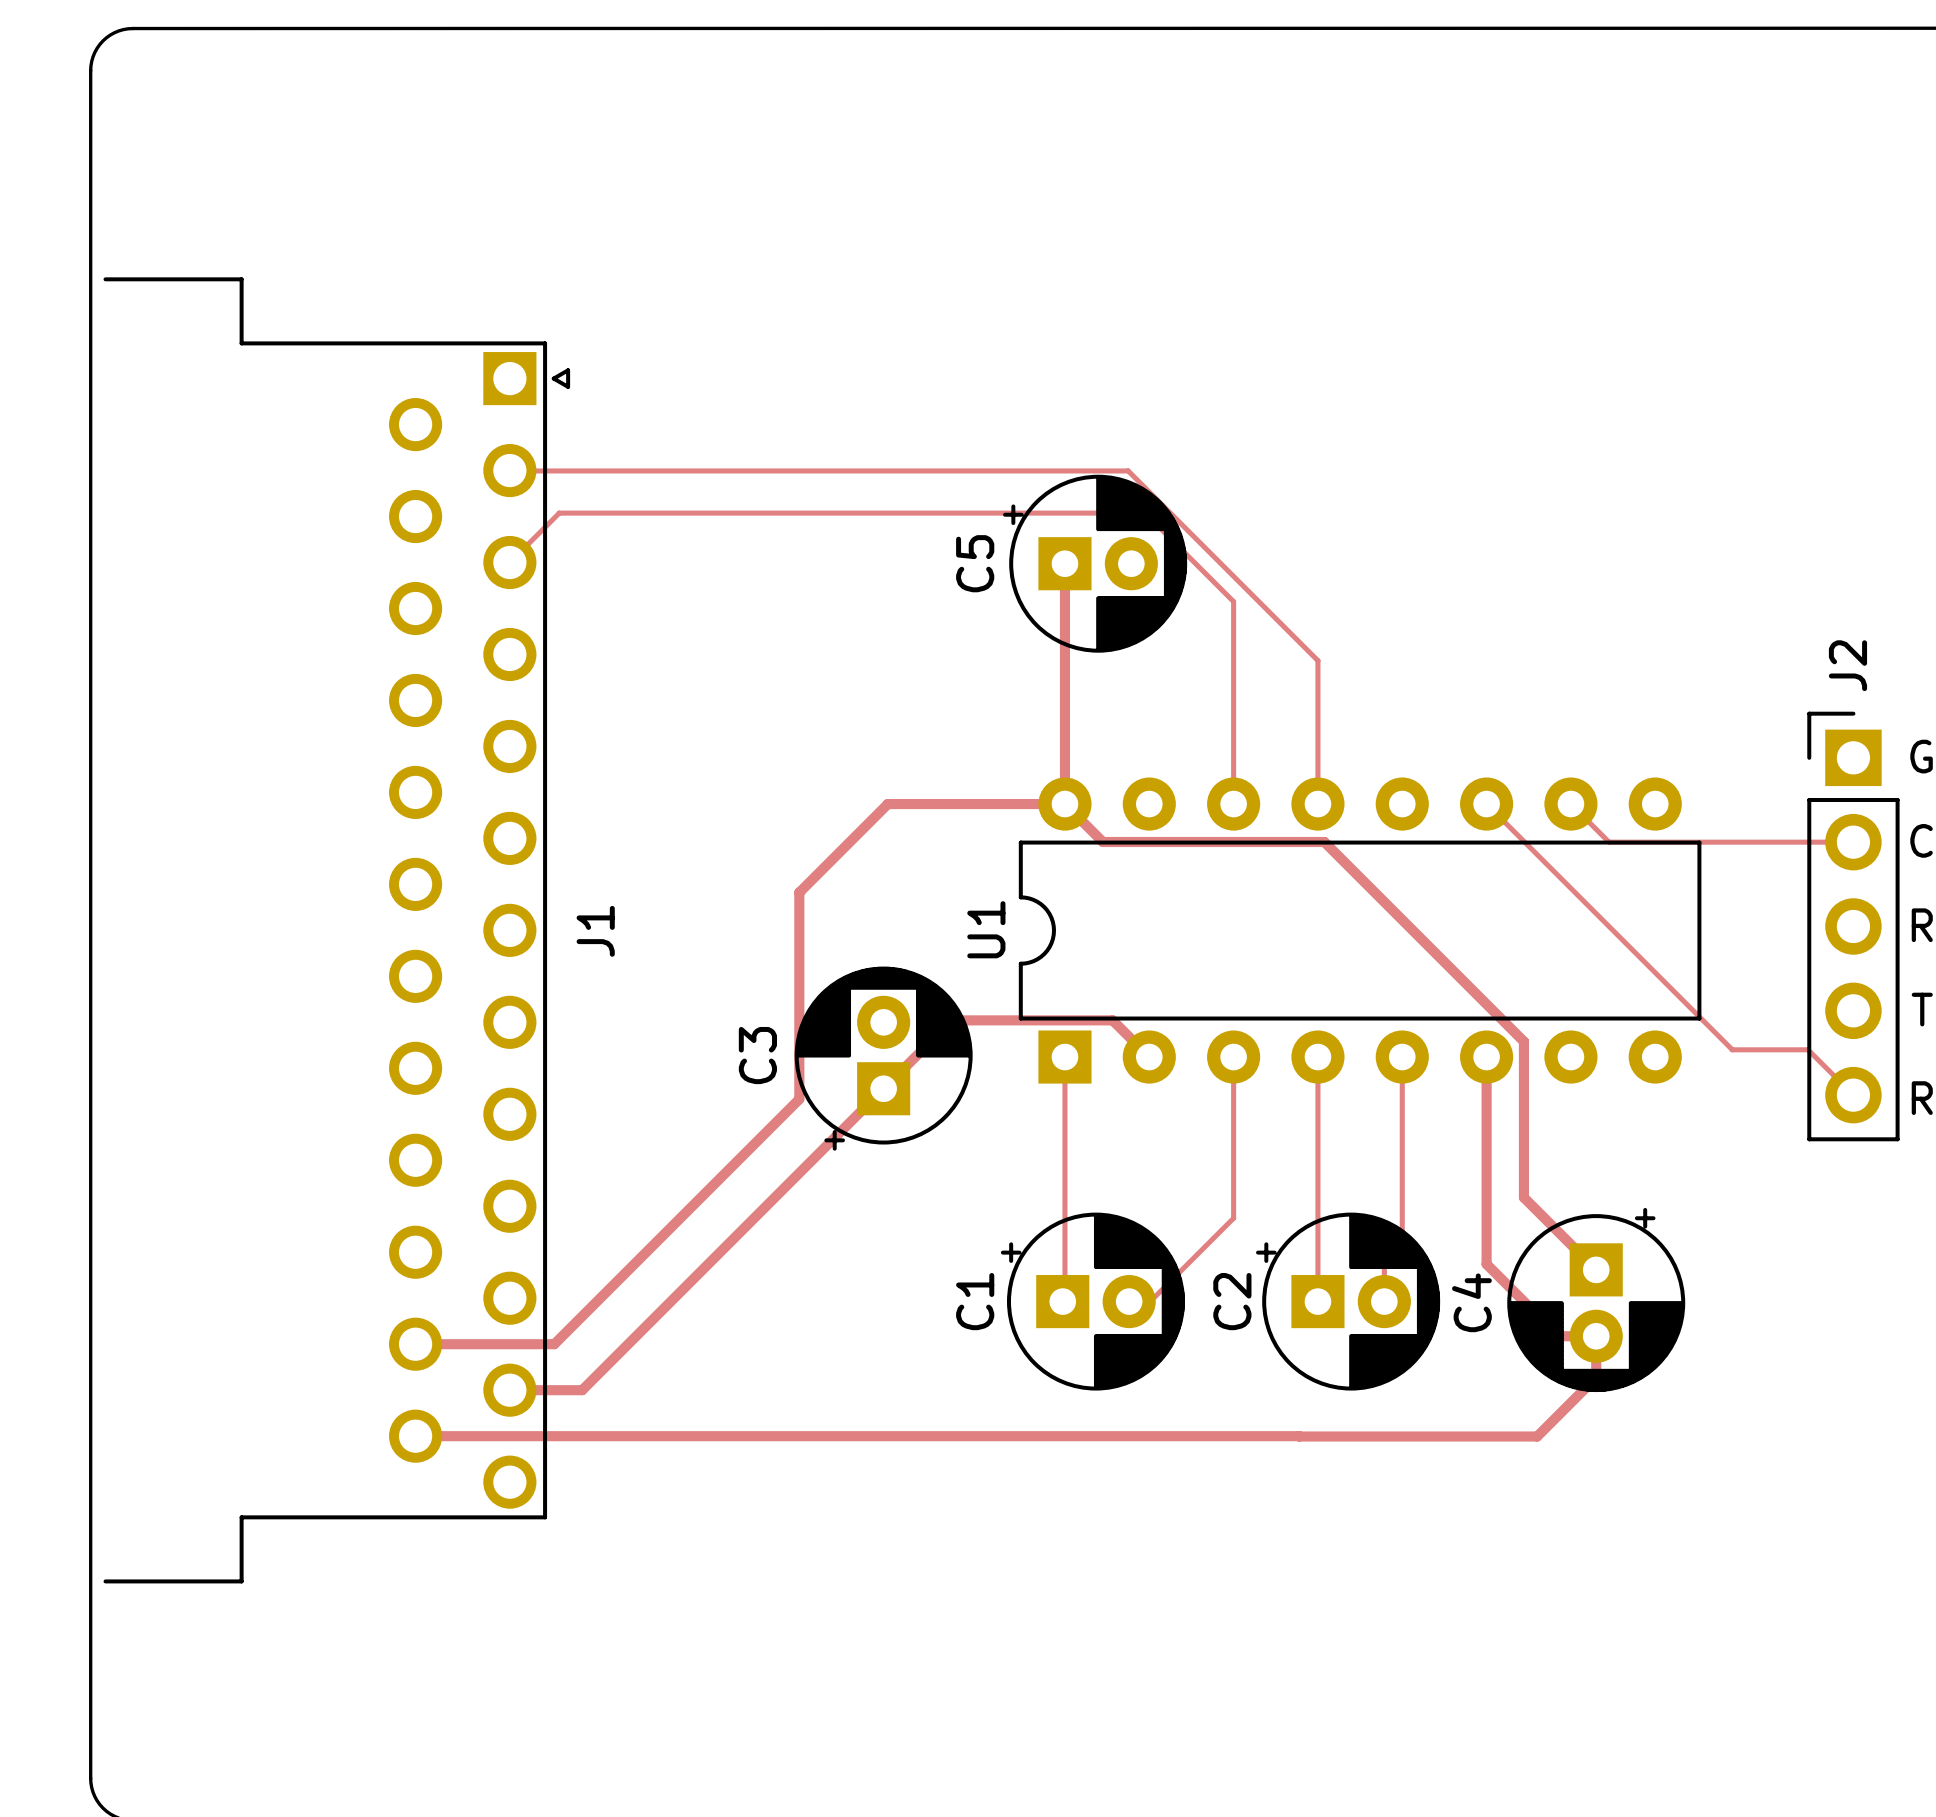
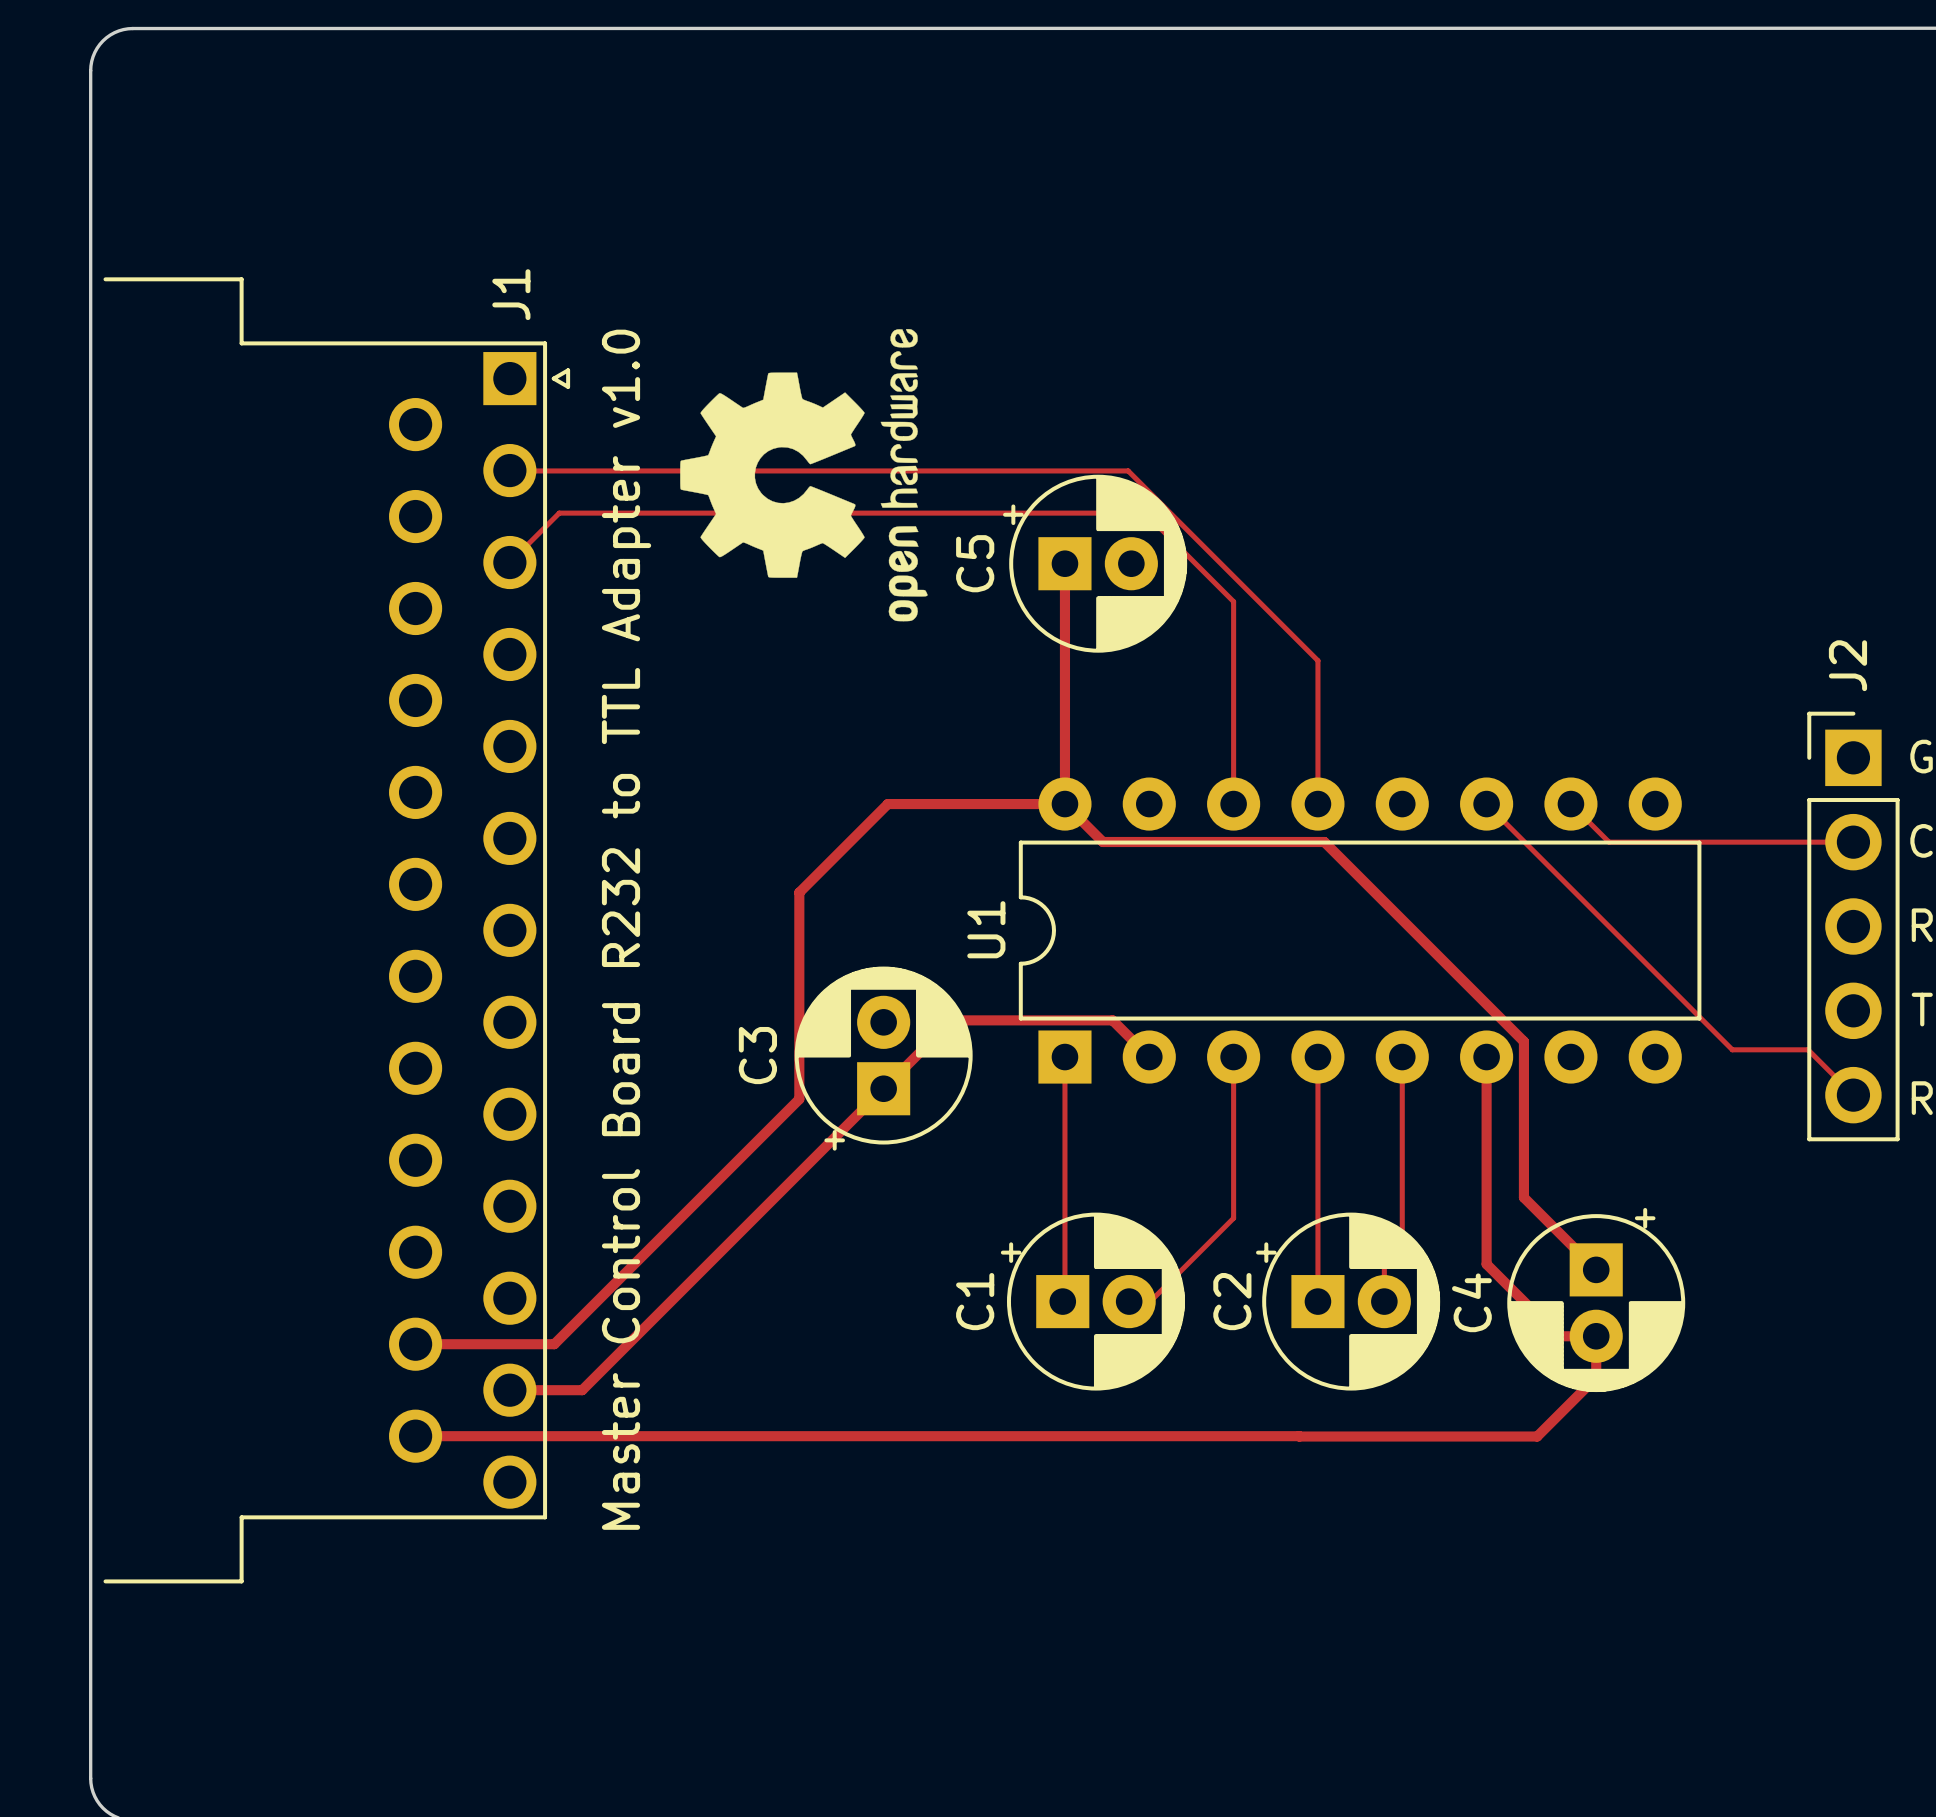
drawing: none -> [680, 329, 928, 622]
text: none -> Master Control Board R232 to TTL Adapter v1.0 (626, 929)
J1 name position: J1 (595, 931) -> J1 (511, 294)

